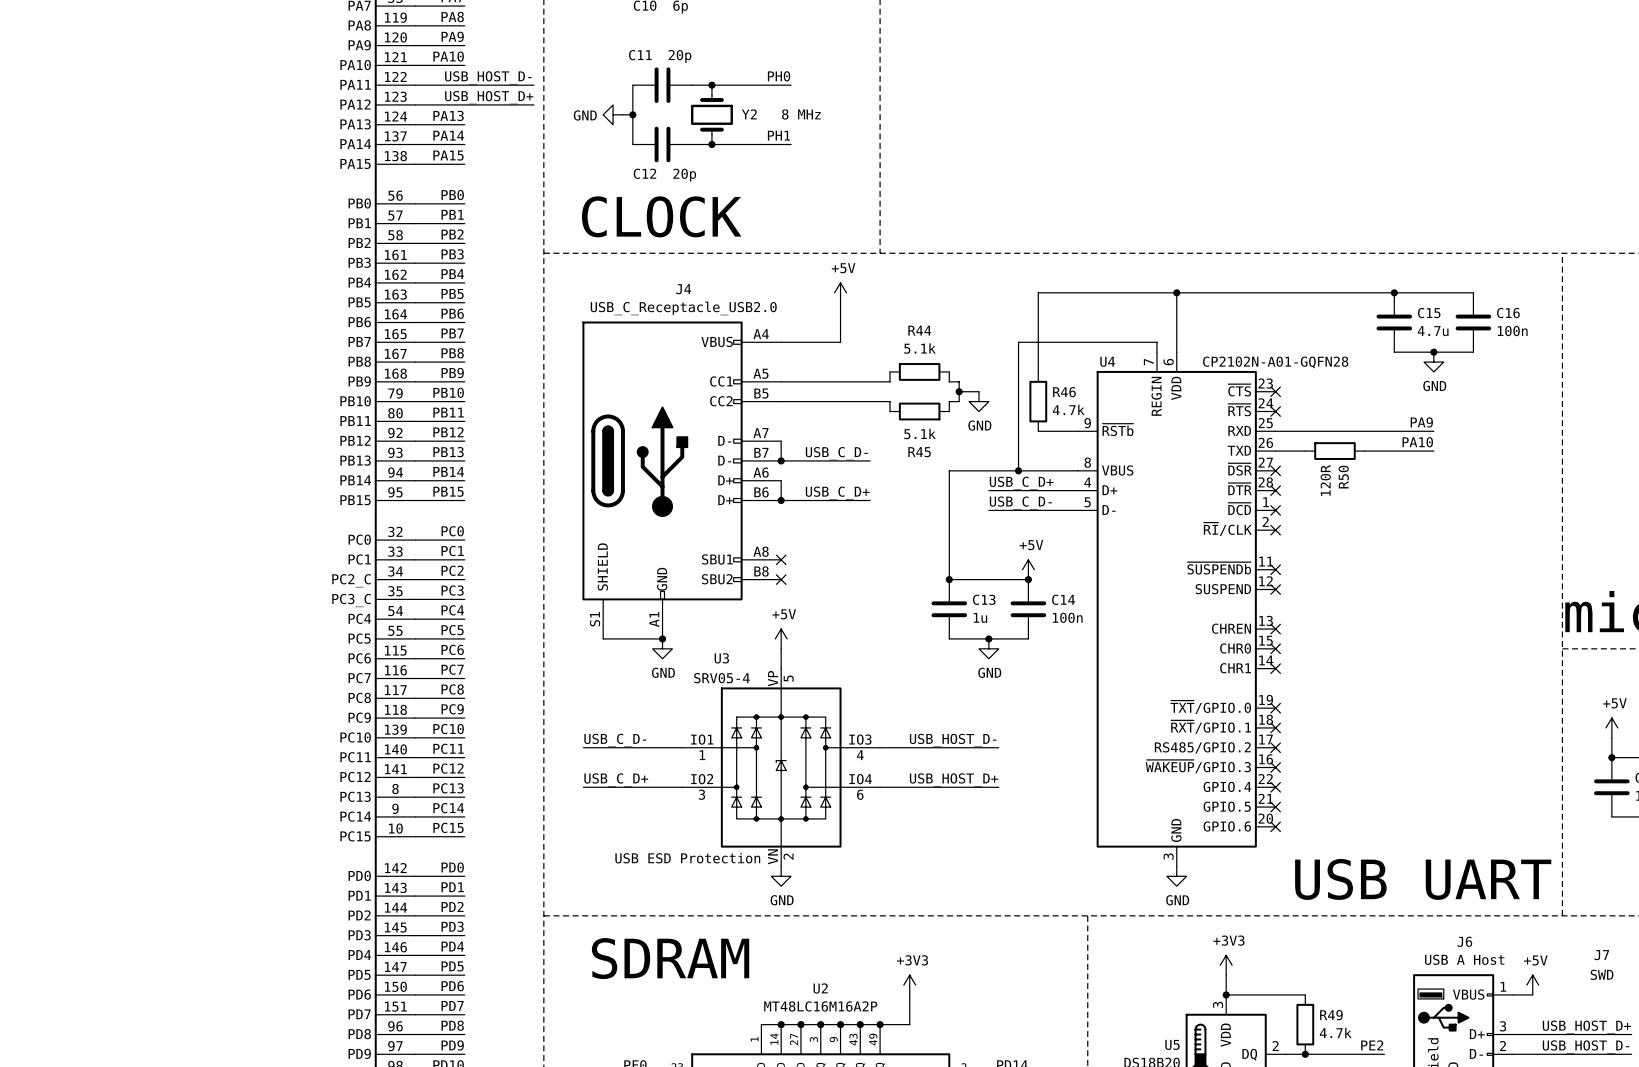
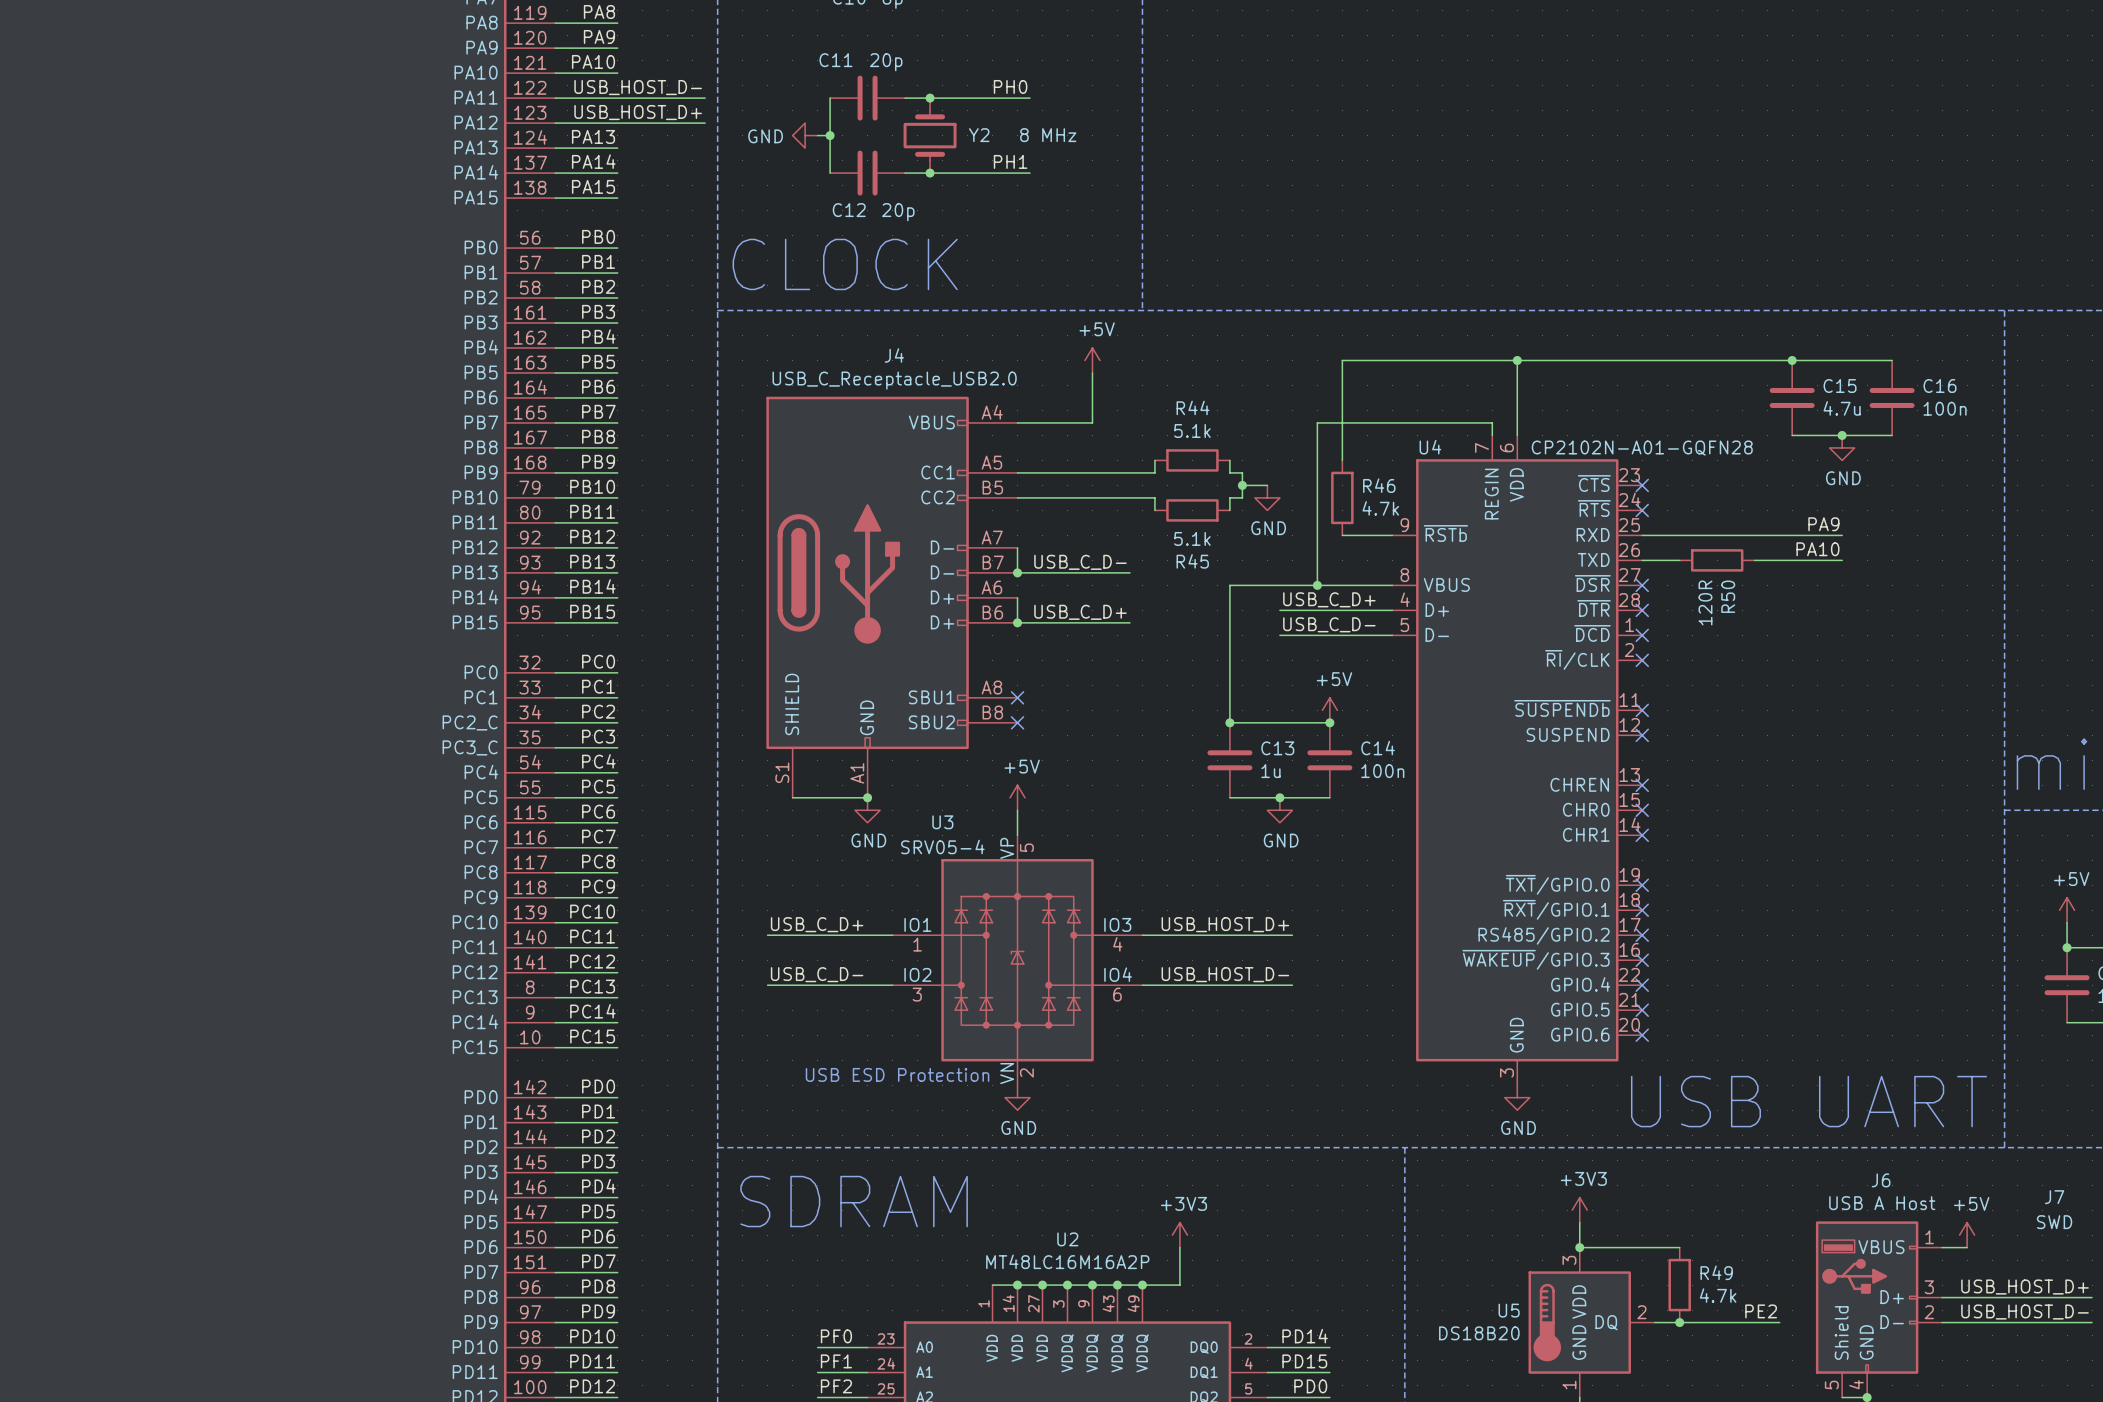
label: USB_C_D- (615, 740) -> USB_C_D+ (817, 924)
label: USB_HOST_D- (953, 740) -> USB_HOST_D+ (1225, 924)
label: USB_C_D+ (616, 779) -> USB_C_D- (817, 974)
label: USB_HOST_D+ (954, 779) -> USB_HOST_D- (1225, 974)

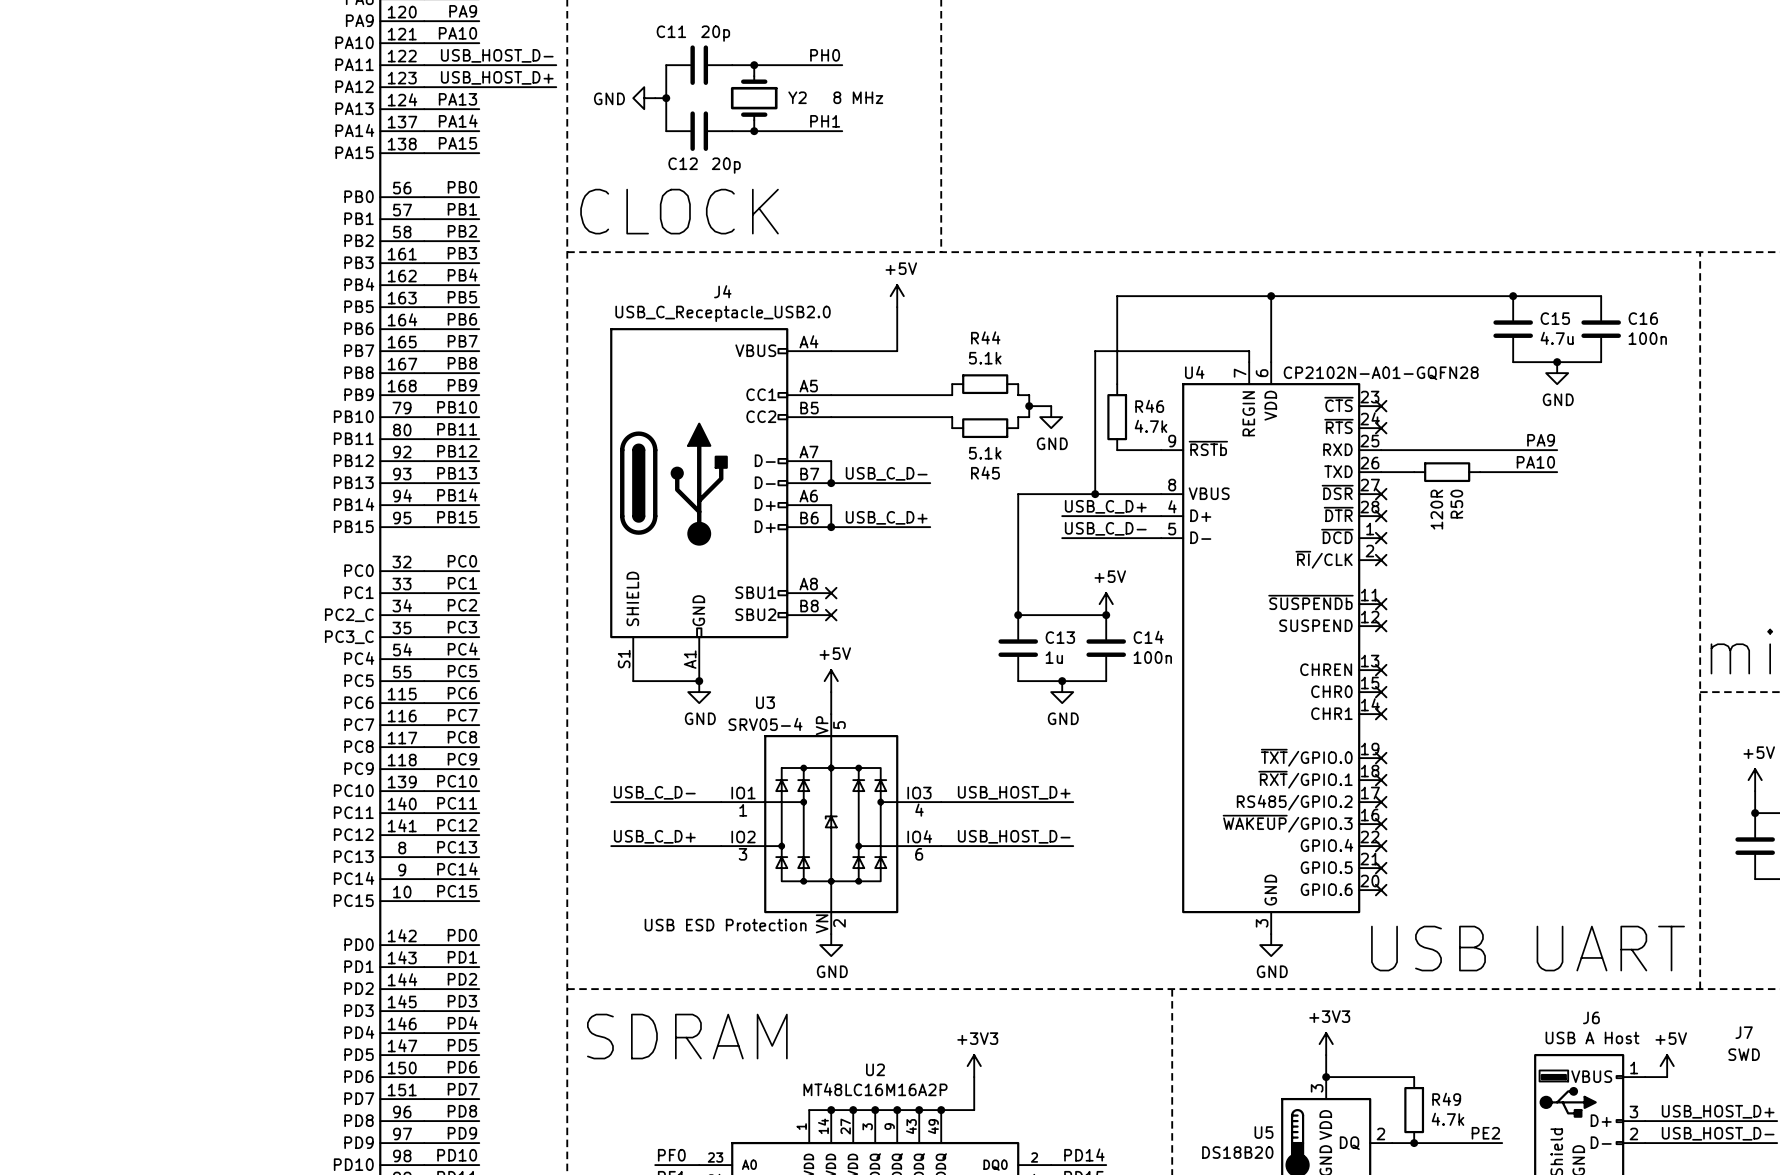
label: USB_C_D+ (817, 924) -> USB_C_D- (654, 792)
label: USB_C_D- (817, 974) -> USB_C_D+ (654, 836)

